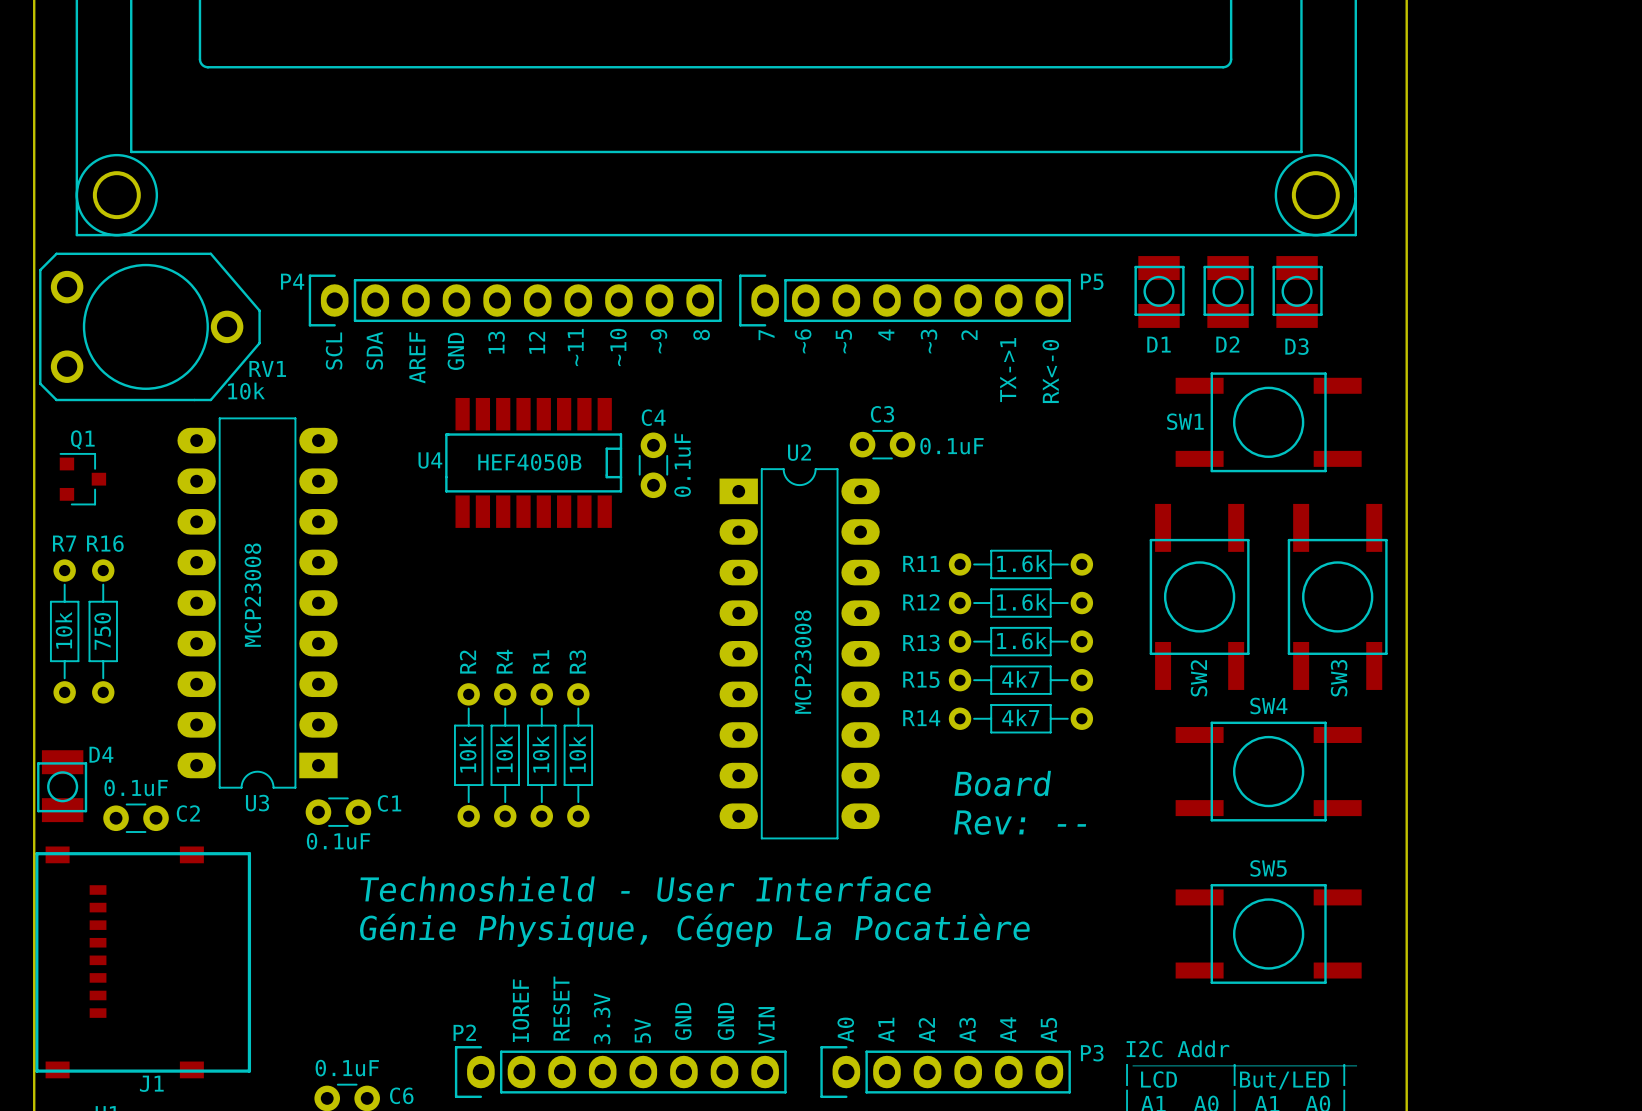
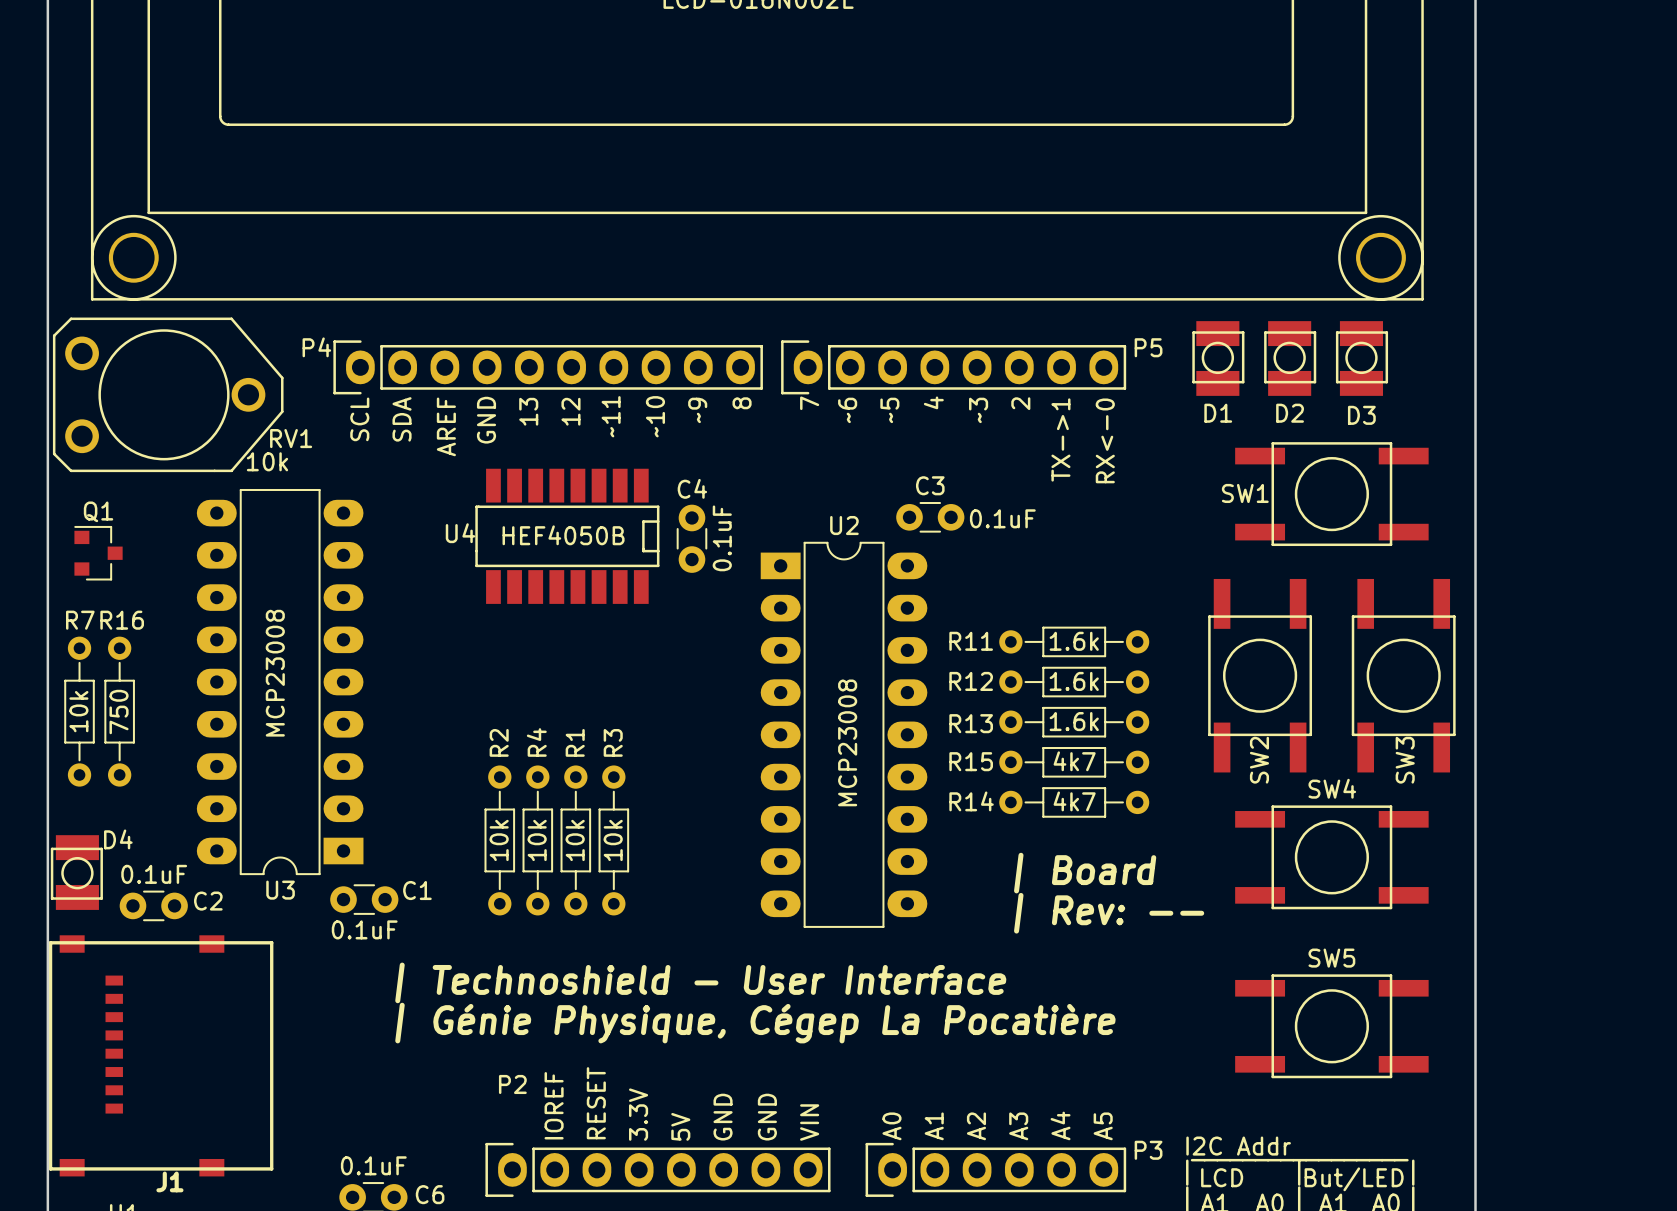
text: Board (1002, 783) -> | Board (1085, 873)
text: Rev: -- (1020, 822) -> | Rev: -- (1109, 913)
text: Technoshield - User Interface (645, 889) -> | Technoshield - User Interface (700, 982)
text: Génie Physique, Cégep La Pocatière (694, 930) -> | Génie Physique, Cégep La Pocatière (755, 1023)
P2 name position: P2 (464, 1032) -> P2 (512, 1084)

